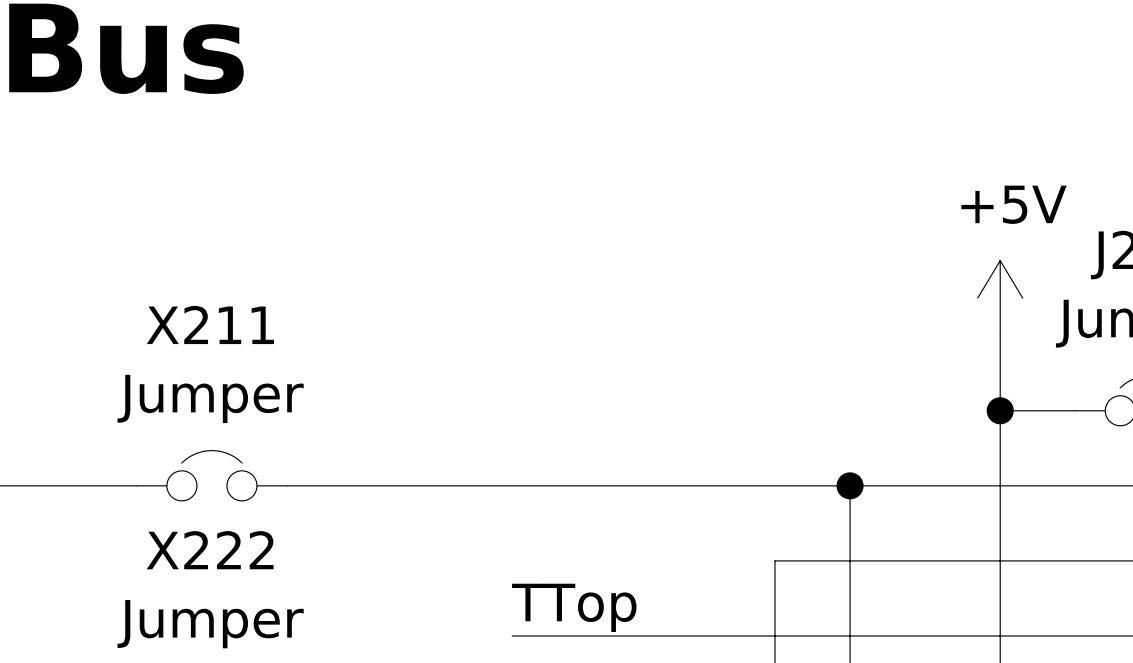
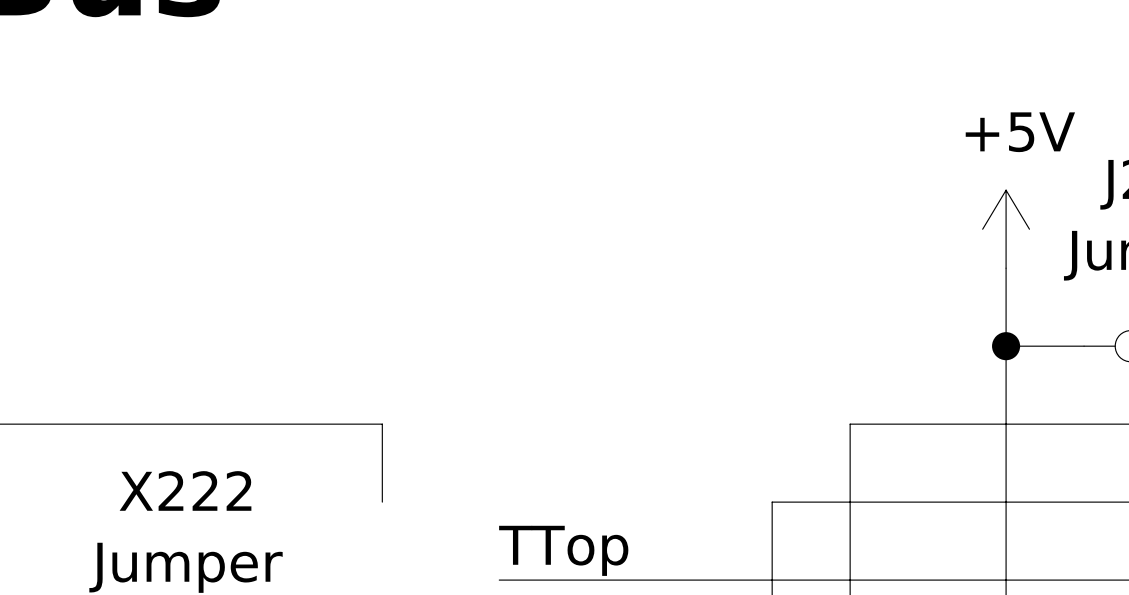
X211: Jumper (211, 475) -> none
wire: none -> (109, 424) (265, 424)
wire: (399, 485) (850, 485) -> (382, 424) (382, 502)
junction: (850, 485) -> none

